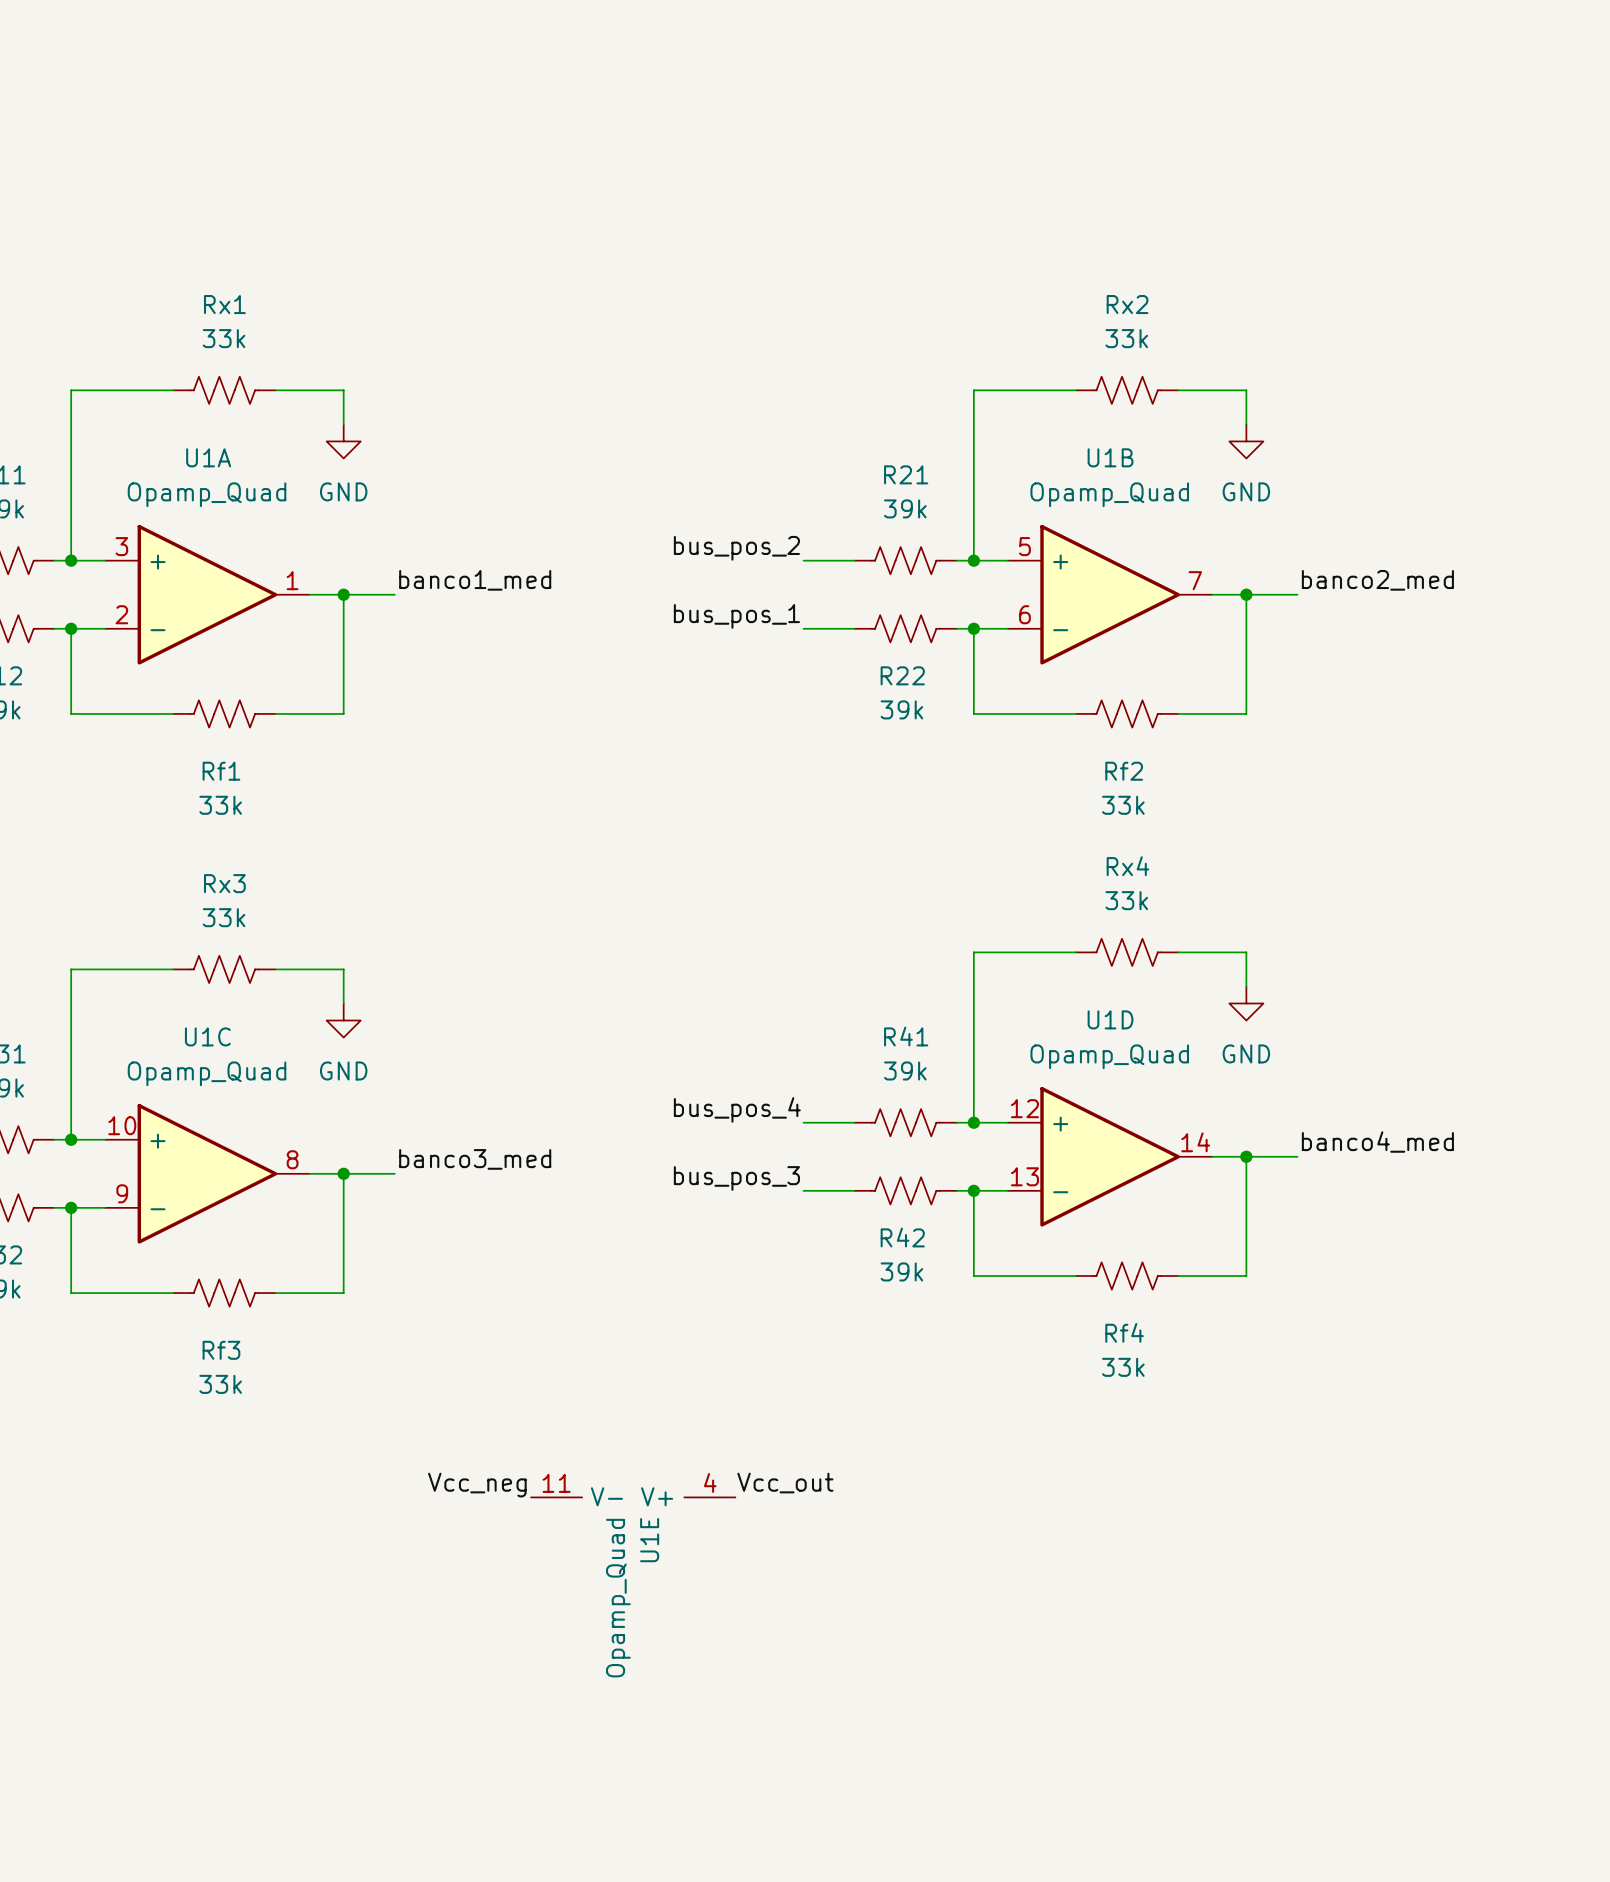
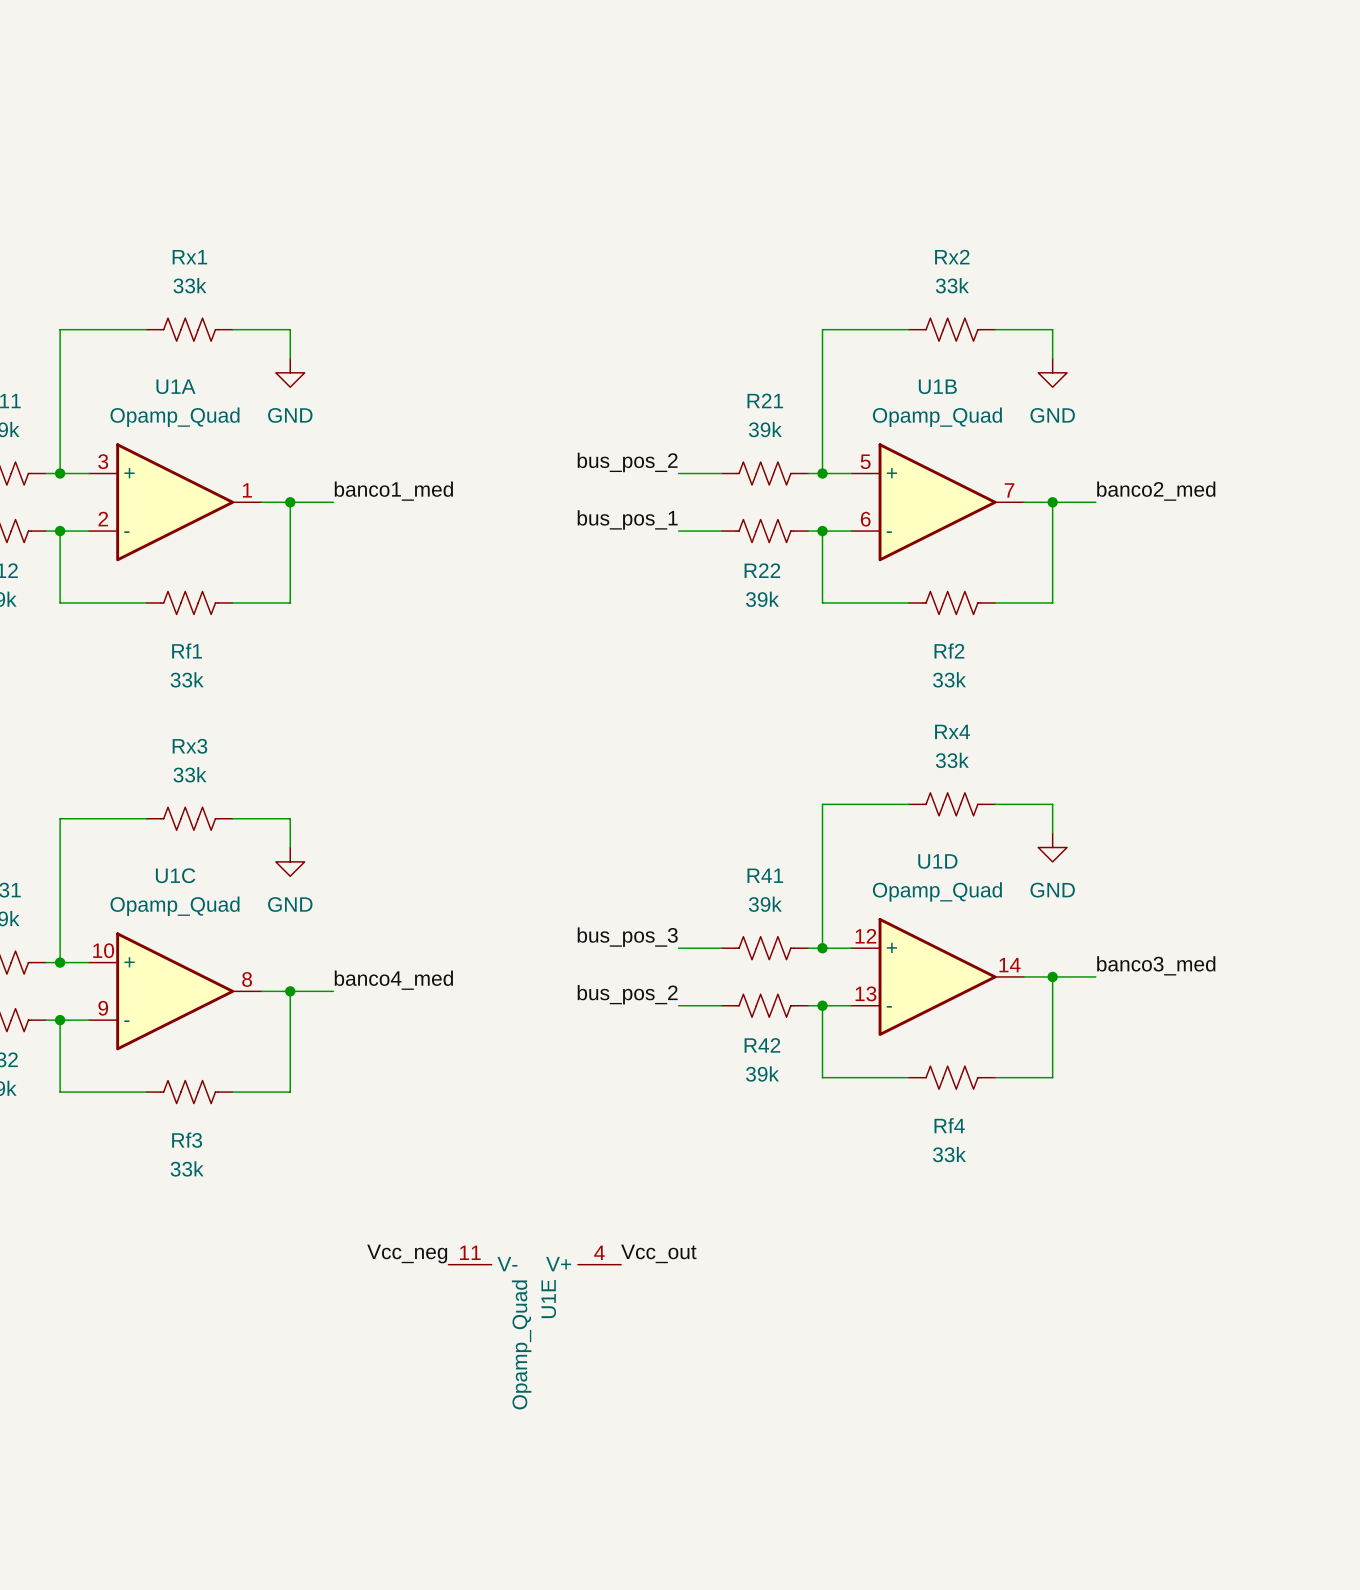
label: bus_pos_4 (737, 1109) -> bus_pos_3 (627, 937)
label: banco4_med (1377, 1141) -> banco3_med (1156, 965)
label: banco3_med (475, 1159) -> banco4_med (393, 980)
label: bus_pos_3 (736, 1178) -> bus_pos_2 (627, 994)

